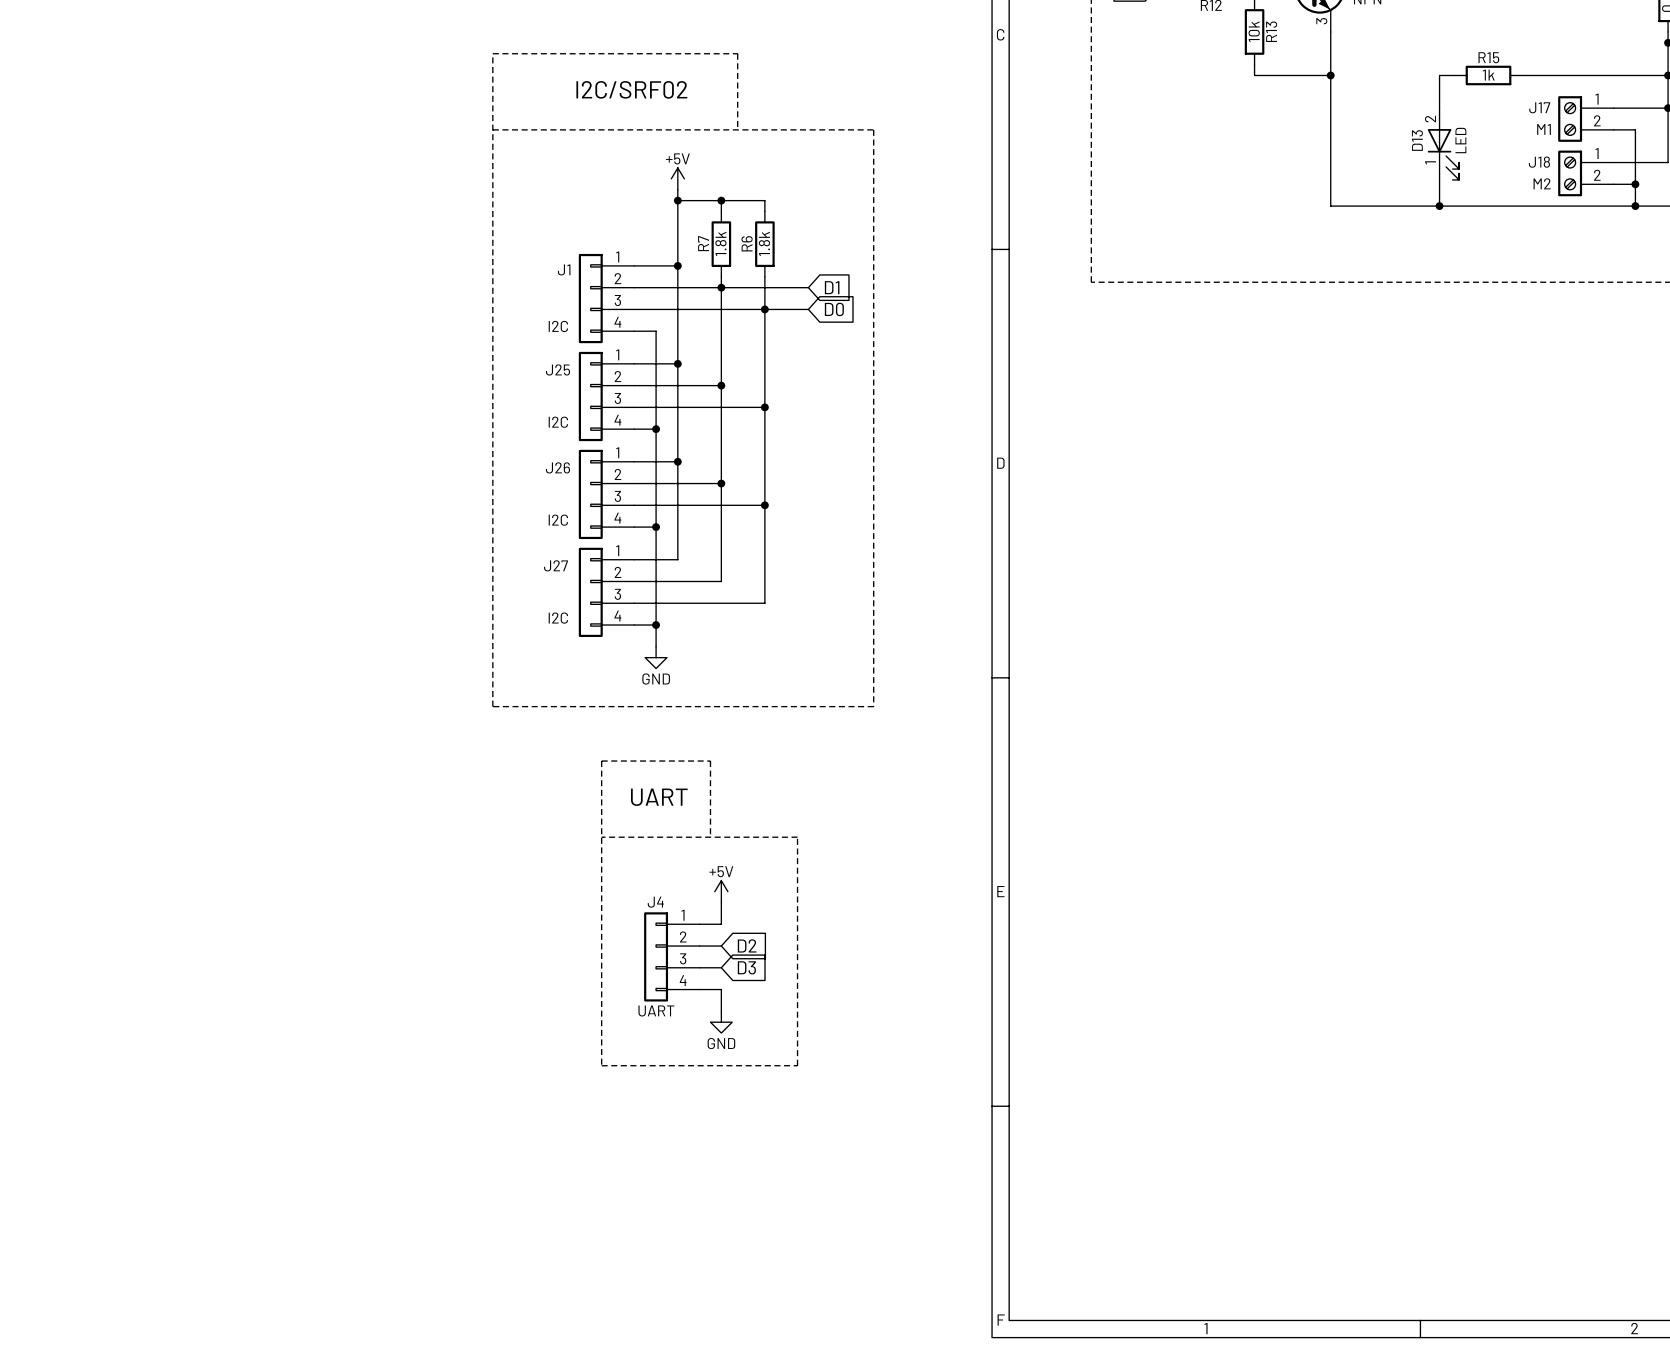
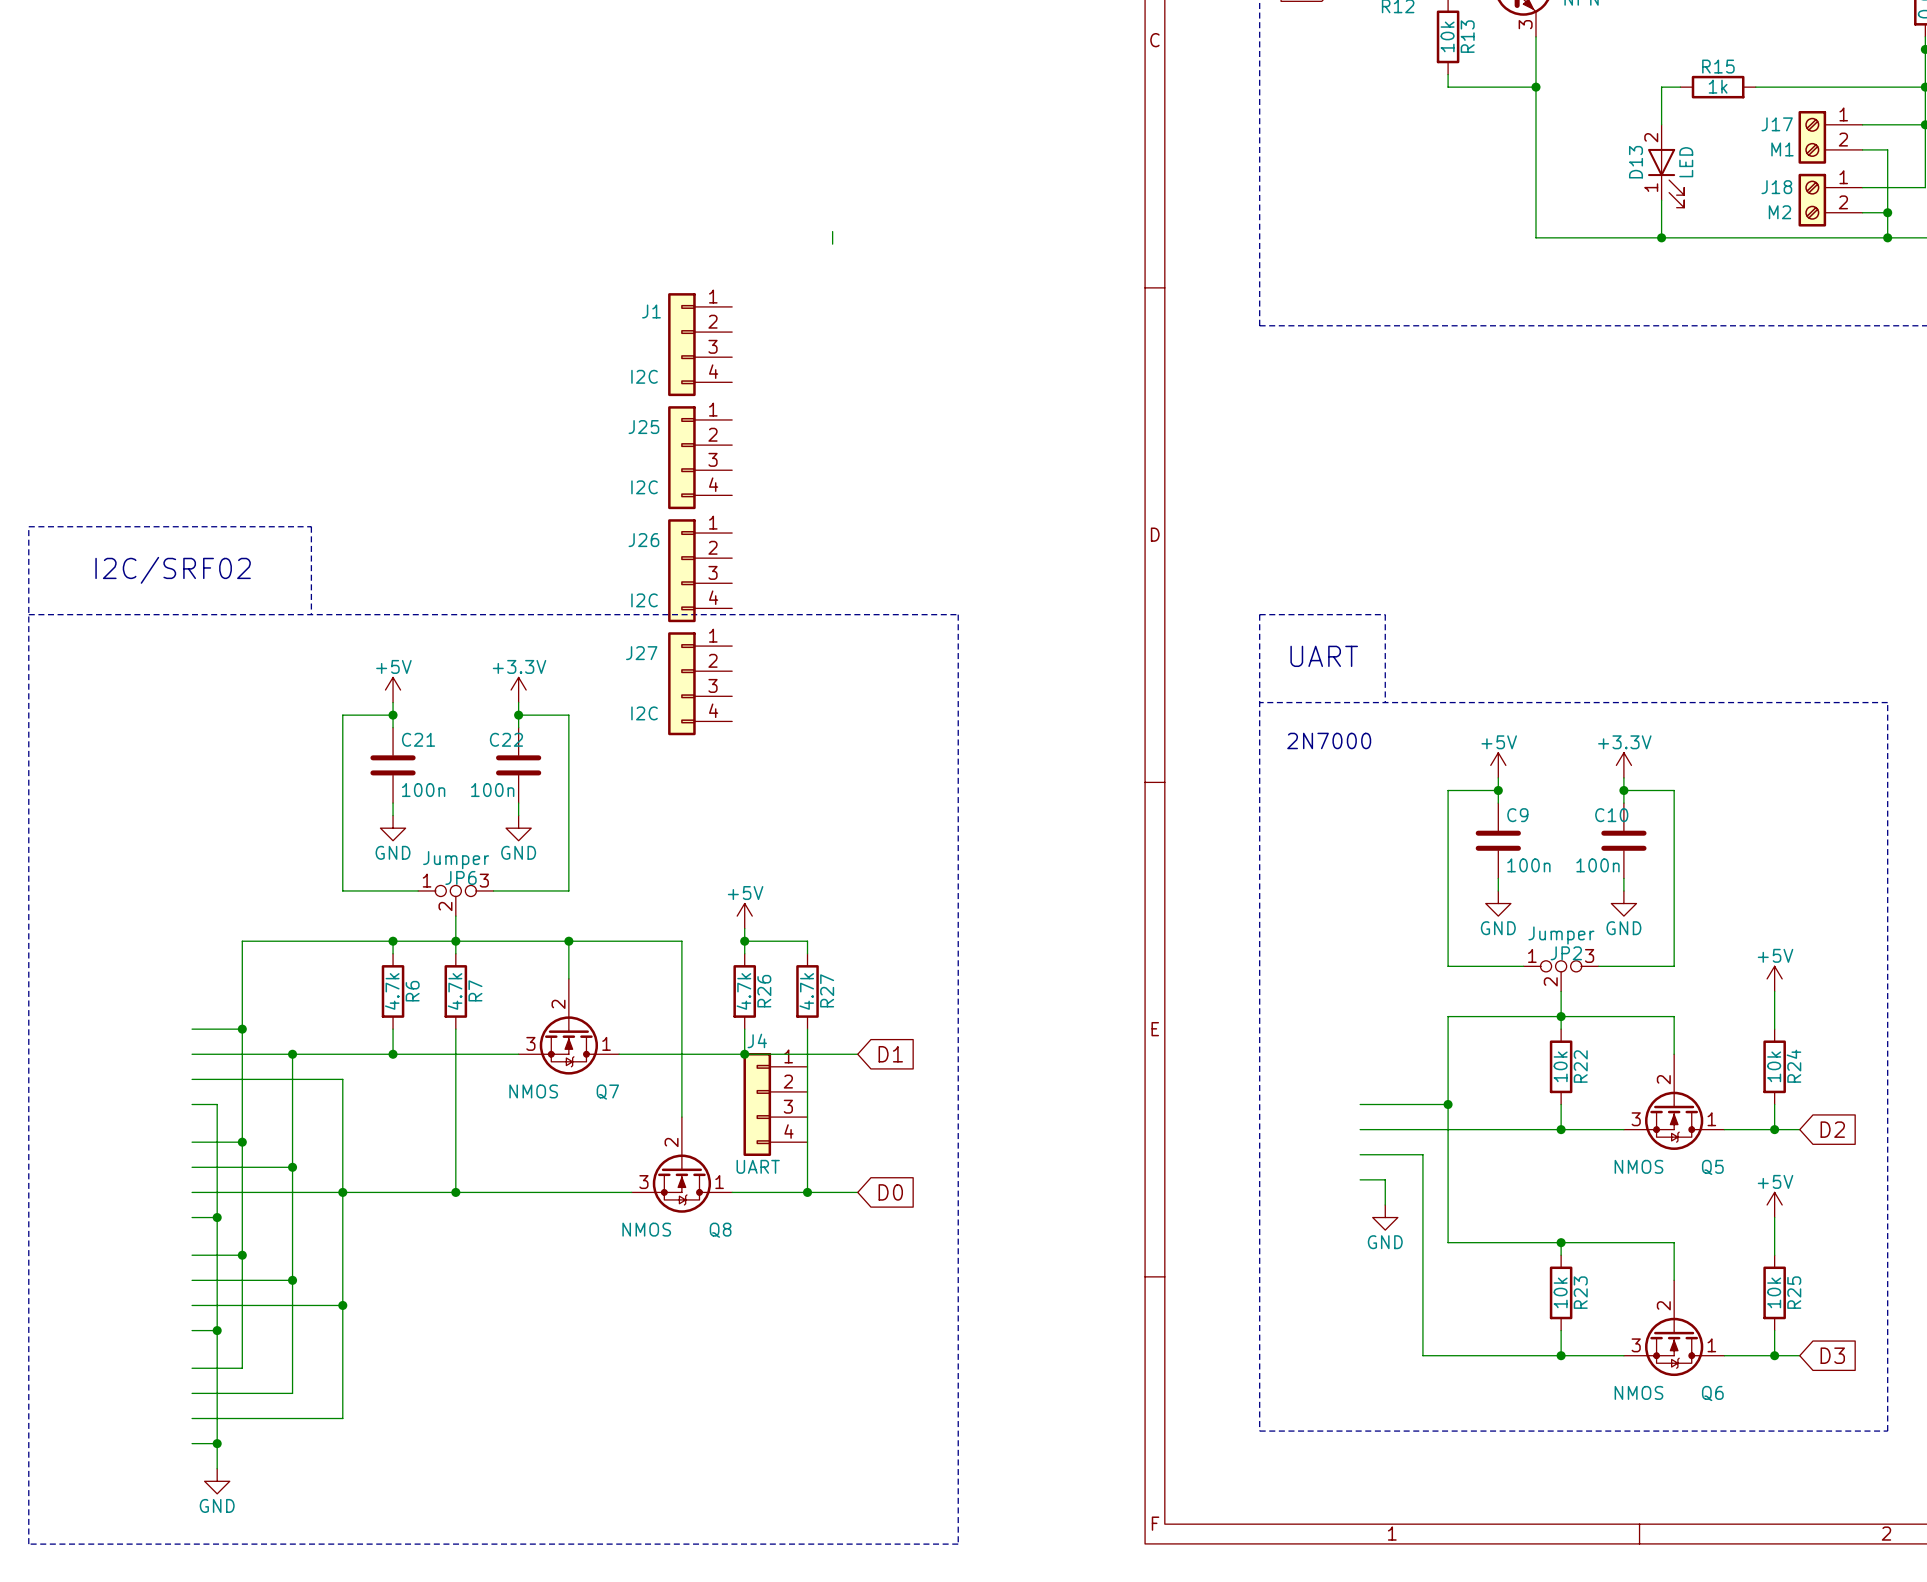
text: I2C/SRF02 (631, 89) -> none
line: (492, 129) (873, 129) (873, 706) (492, 706) (492, 53) (737, 53) (737, 129) -> none
power symbol: +5V (677, 178) -> none
wire: (677, 189) (677, 559) (634, 559) -> none
wire: (677, 200) (764, 200) (764, 211) -> none
junction: (677, 200) -> none
junction: (721, 200) -> none
R7 name position: R7 (703, 243) -> R7 (475, 990)
R7 value: 1.8k (720, 243) -> 4.7k (455, 991)
R6 name position: R6 (747, 243) -> R6 (412, 991)
R6 value: 1.8k (764, 243) -> 4.7k (392, 991)
R7 position: (721, 244) -> (455, 991)
R6 position: (764, 244) -> (393, 991)
wire: (634, 265) (677, 265) -> none
junction: (677, 265) -> none
wire: (721, 276) (721, 581) (634, 581) -> none
wire: (764, 276) (764, 603) (634, 603) -> none
wire: (634, 287) (808, 287) -> none
junction: (721, 287) -> none
global label: D1 (832, 287) -> none
wire: (634, 309) (808, 309) -> none
junction: (764, 309) -> none
global label: D0 (834, 309) -> none
wire: (634, 331) (656, 331) (656, 646) -> none
wire: (634, 363) (677, 363) -> none
junction: (677, 363) -> none
wire: (634, 385) (721, 385) -> none
junction: (721, 385) -> none
wire: (634, 407) (764, 407) -> none
junction: (764, 407) -> none
wire: (634, 429) (656, 429) -> none
junction: (656, 429) -> none
wire: (634, 461) (677, 461) -> none
junction: (677, 461) -> none
wire: (634, 483) (721, 483) -> none
junction: (721, 483) -> none
text: none -> I2C/SRF02 (173, 570)
wire: (634, 505) (764, 505) -> none
junction: (764, 505) -> none
wire: (634, 527) (656, 527) -> none
junction: (656, 527) -> none
line: none -> (28, 614) (958, 614) (958, 1544) (28, 1544) (28, 526) (311, 526) (311, 614)
text: none -> UART (1324, 656)
power symbol: none -> +5V (393, 690)
power symbol: none -> +3.3V (518, 690)
wire: none -> (393, 702) (393, 727)
wire: none -> (518, 702) (518, 727)
line: none -> (1259, 702) (1887, 702) (1887, 1431) (1259, 1431) (1259, 614) (1385, 614) (1385, 702)
wire: none -> (393, 715) (342, 715) (342, 890) (418, 890)
junction: none -> (393, 715)
wire: none -> (518, 715) (568, 715) (568, 890) (493, 890)
junction: none -> (518, 715)
wire: (634, 625) (656, 625) -> none
junction: (656, 625) -> none
text: none -> 2N7000 (1329, 740)
power symbol: GND (656, 657) -> none
C21: none -> 100n (393, 765)
C22: none -> 100n (518, 765)
power symbol: none -> +5V (1498, 765)
power symbol: none -> +3.3V (1623, 765)
wire: none -> (1498, 777) (1498, 803)
wire: none -> (1623, 777) (1623, 803)
wire: none -> (1498, 790) (1448, 790) (1448, 966) (1523, 966)
junction: none -> (1498, 790)
wire: none -> (1623, 790) (1674, 790) (1674, 966) (1598, 966)
junction: none -> (1623, 790)
wire: none -> (393, 803) (393, 815)
wire: none -> (518, 803) (518, 815)
power symbol: none -> GND (393, 828)
power symbol: none -> GND (518, 828)
C9: none -> 100n (1498, 840)
C10: none -> 100n (1623, 840)
wire: none -> (1498, 878) (1498, 890)
wire: none -> (1623, 878) (1623, 890)
JP6: none -> Jumper (455, 900)
power symbol: none -> GND (1498, 903)
power symbol: none -> GND (1623, 903)
wire: none -> (455, 916) (455, 953)
text: UART (659, 797) -> none
wire: none -> (744, 928) (744, 953)
wire: none -> (393, 941) (393, 953)
junction: none -> (393, 941)
junction: none -> (455, 941)
wire: none -> (568, 941) (568, 978)
junction: none -> (568, 941)
wire: none -> (744, 941) (807, 941) (807, 953)
junction: none -> (744, 941)
line: (601, 837) (797, 837) (797, 1065) (601, 1065) (601, 761) (710, 761) (710, 837) -> none
JP2: none -> Jumper (1561, 976)
power symbol: none -> +5V (1774, 978)
R26: none -> 4.7k (744, 991)
R27: none -> 4.7k (807, 991)
wire: none -> (1561, 991) (1561, 1029)
wire: none -> (1774, 991) (1774, 1029)
junction: none -> (1561, 1016)
Q7: none -> NMOS (568, 1026)
wire: none -> (192, 1029) (242, 1029)
junction: none -> (242, 1029)
wire: none -> (393, 1029) (393, 1054)
wire: none -> (455, 1029) (455, 1192)
wire: none -> (744, 1029) (744, 1054)
wire: none -> (807, 1029) (807, 1192)
power symbol position: +5V (721, 891) -> +5V (744, 916)
wire: (721, 902) (721, 924) (699, 924) -> none
wire: none -> (192, 1054) (518, 1054)
wire: none -> (292, 1054) (292, 1393) (192, 1393)
junction: none -> (292, 1054)
junction: none -> (393, 1054)
wire: none -> (619, 1054) (857, 1054)
junction: none -> (744, 1054)
global label: none -> D1 (890, 1054)
wire: none -> (1674, 1054) (1674, 1016) (1448, 1016) (1448, 1242) (1674, 1242) (1674, 1280)
R22: none -> 10k (1561, 1066)
R24: none -> 10k (1774, 1066)
wire: none -> (192, 1079) (342, 1079) (342, 1418) (192, 1418)
global label: D2 (747, 945) -> none
wire: (699, 946) (721, 946) -> none
Q5: none -> NMOS (1674, 1102)
wire: none -> (192, 1104) (217, 1104) (217, 1468)
wire: none -> (1360, 1104) (1448, 1104)
junction: none -> (1448, 1104)
wire: none -> (1561, 1104) (1561, 1129)
wire: none -> (1774, 1104) (1774, 1129)
wire: none -> (681, 1117) (681, 941) (242, 941) (242, 1368) (192, 1368)
wire: (699, 967) (721, 967) -> none
global label: D3 (746, 967) -> none
wire: none -> (1360, 1129) (1623, 1129)
junction: none -> (1561, 1129)
wire: none -> (1724, 1129) (1799, 1129)
junction: none -> (1774, 1129)
global label: none -> D2 (1832, 1129)
wire: none -> (192, 1142) (242, 1142)
junction: none -> (242, 1142)
wire: (699, 989) (721, 989) (721, 1011) -> none
wire: none -> (1360, 1154) (1422, 1154) (1422, 1355) (1623, 1355)
Q8: none -> NMOS (681, 1164)
wire: none -> (192, 1167) (292, 1167)
junction: none -> (292, 1167)
power symbol: GND (721, 1022) -> none
wire: none -> (1360, 1179) (1385, 1179) (1385, 1204)
wire: none -> (192, 1192) (631, 1192)
junction: none -> (342, 1192)
junction: none -> (455, 1192)
wire: none -> (732, 1192) (857, 1192)
junction: none -> (807, 1192)
global label: none -> D0 (890, 1192)
power symbol: none -> +5V (1774, 1204)
wire: none -> (192, 1217) (217, 1217)
junction: none -> (217, 1217)
power symbol: none -> GND (1385, 1217)
wire: none -> (1774, 1217) (1774, 1255)
wire: none -> (1561, 1242) (1561, 1255)
junction: none -> (1561, 1242)
wire: none -> (192, 1255) (242, 1255)
junction: none -> (242, 1255)
wire: none -> (192, 1280) (292, 1280)
junction: none -> (292, 1280)
R23: none -> 10k (1561, 1292)
R25: none -> 10k (1774, 1292)
wire: none -> (192, 1305) (342, 1305)
junction: none -> (342, 1305)
Q6: none -> NMOS (1674, 1328)
wire: none -> (192, 1330) (217, 1330)
junction: none -> (217, 1330)
wire: none -> (1561, 1330) (1561, 1355)
wire: none -> (1774, 1330) (1774, 1355)
junction: none -> (1561, 1355)
wire: none -> (1724, 1355) (1799, 1355)
junction: none -> (1774, 1355)
global label: none -> D3 (1832, 1355)
wire: none -> (192, 1443) (217, 1443)
junction: none -> (217, 1443)
power symbol: none -> GND (217, 1481)

